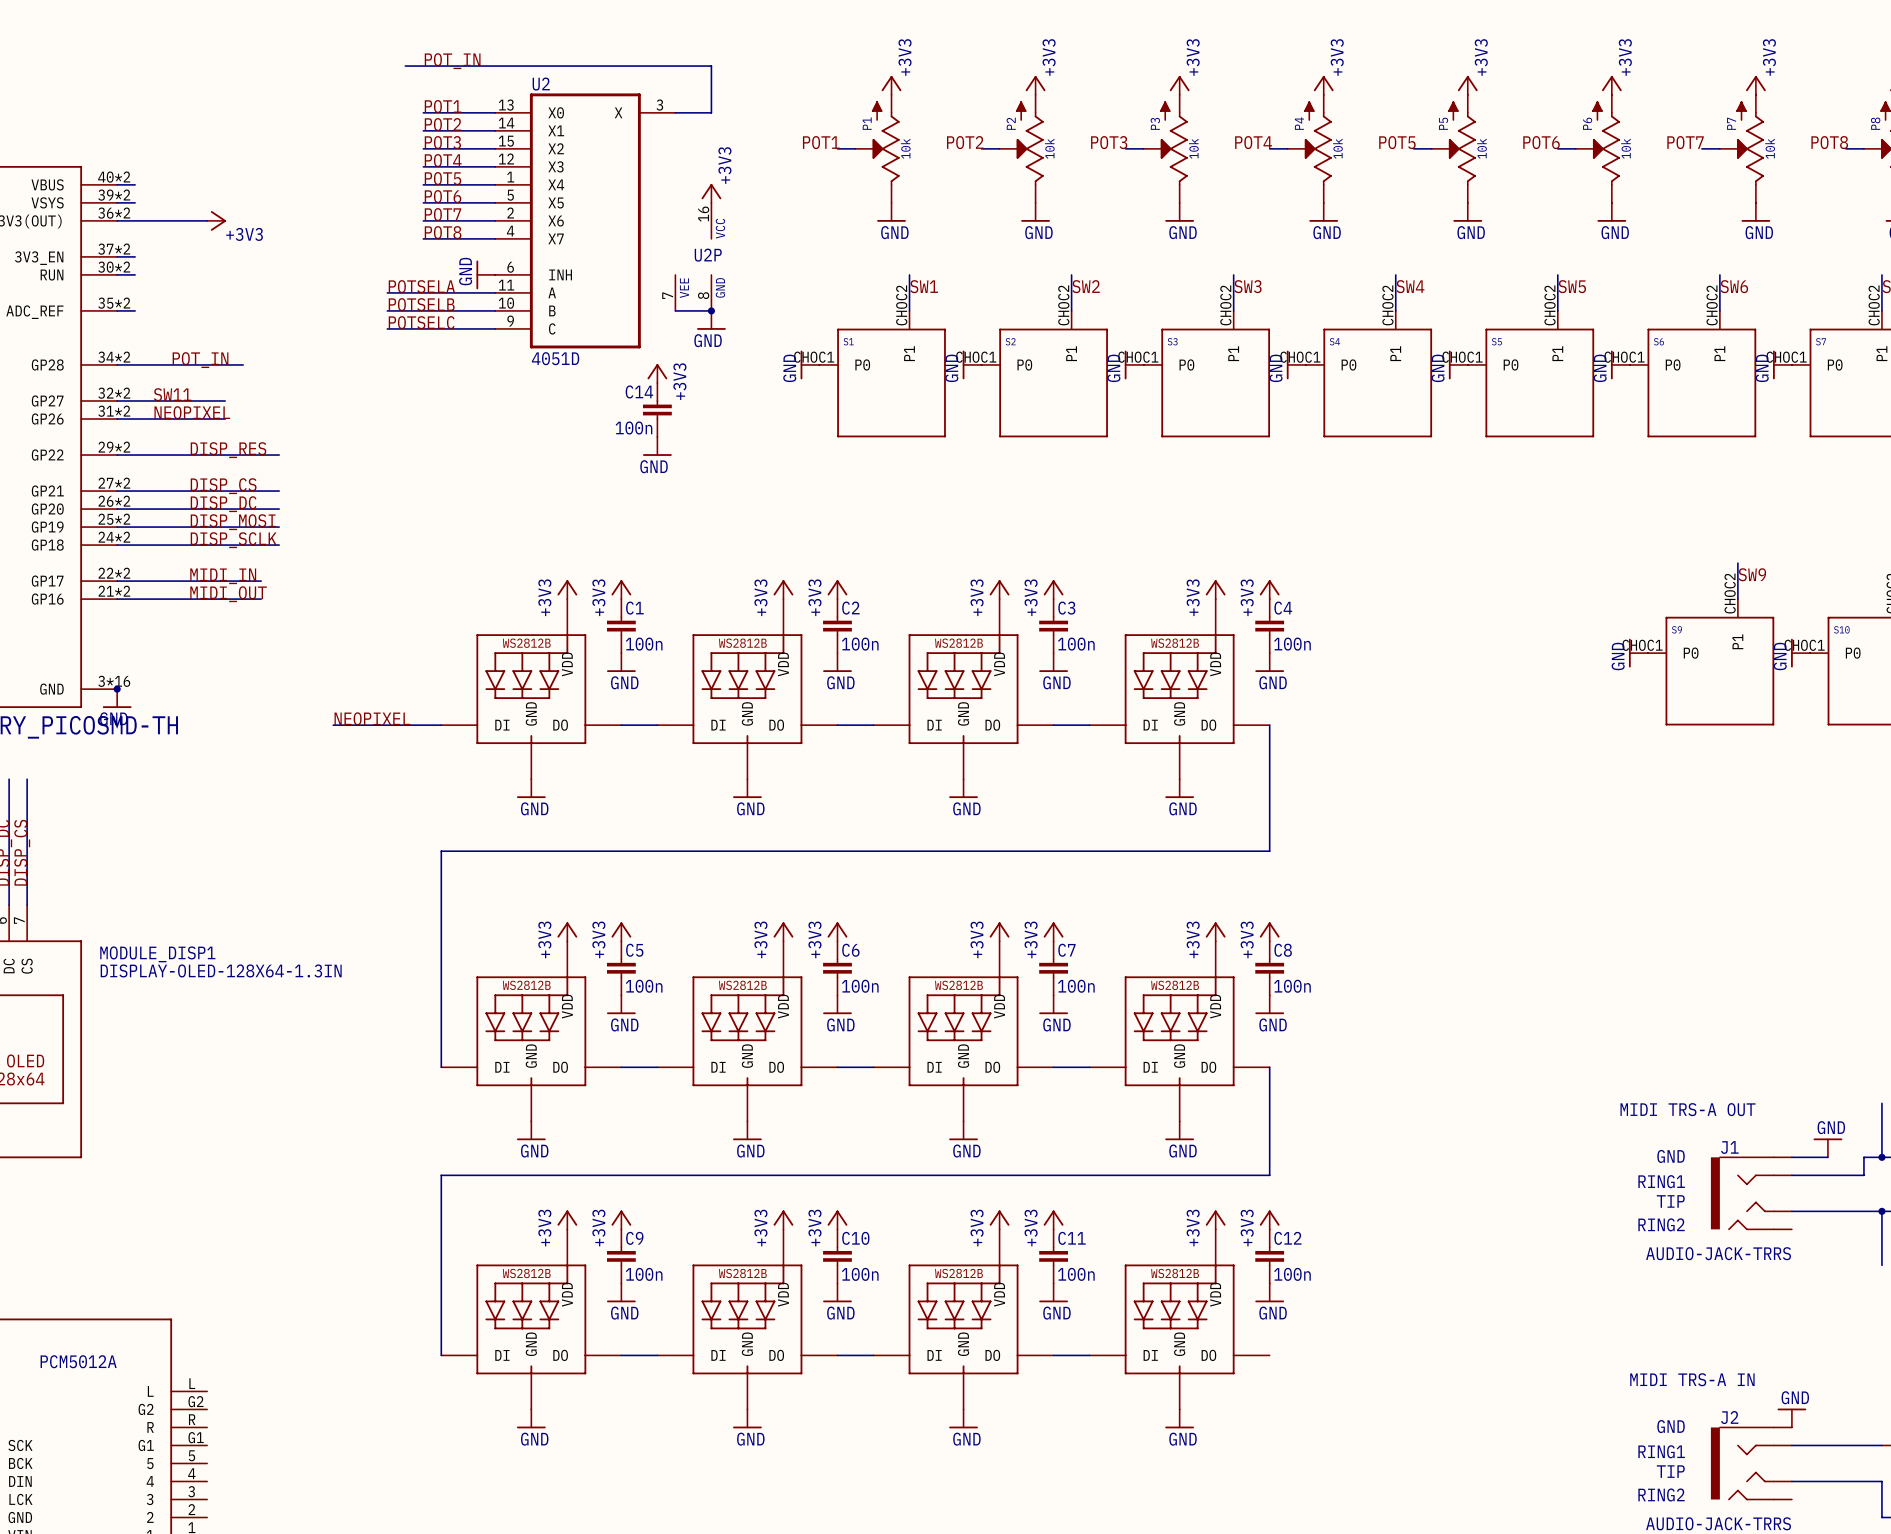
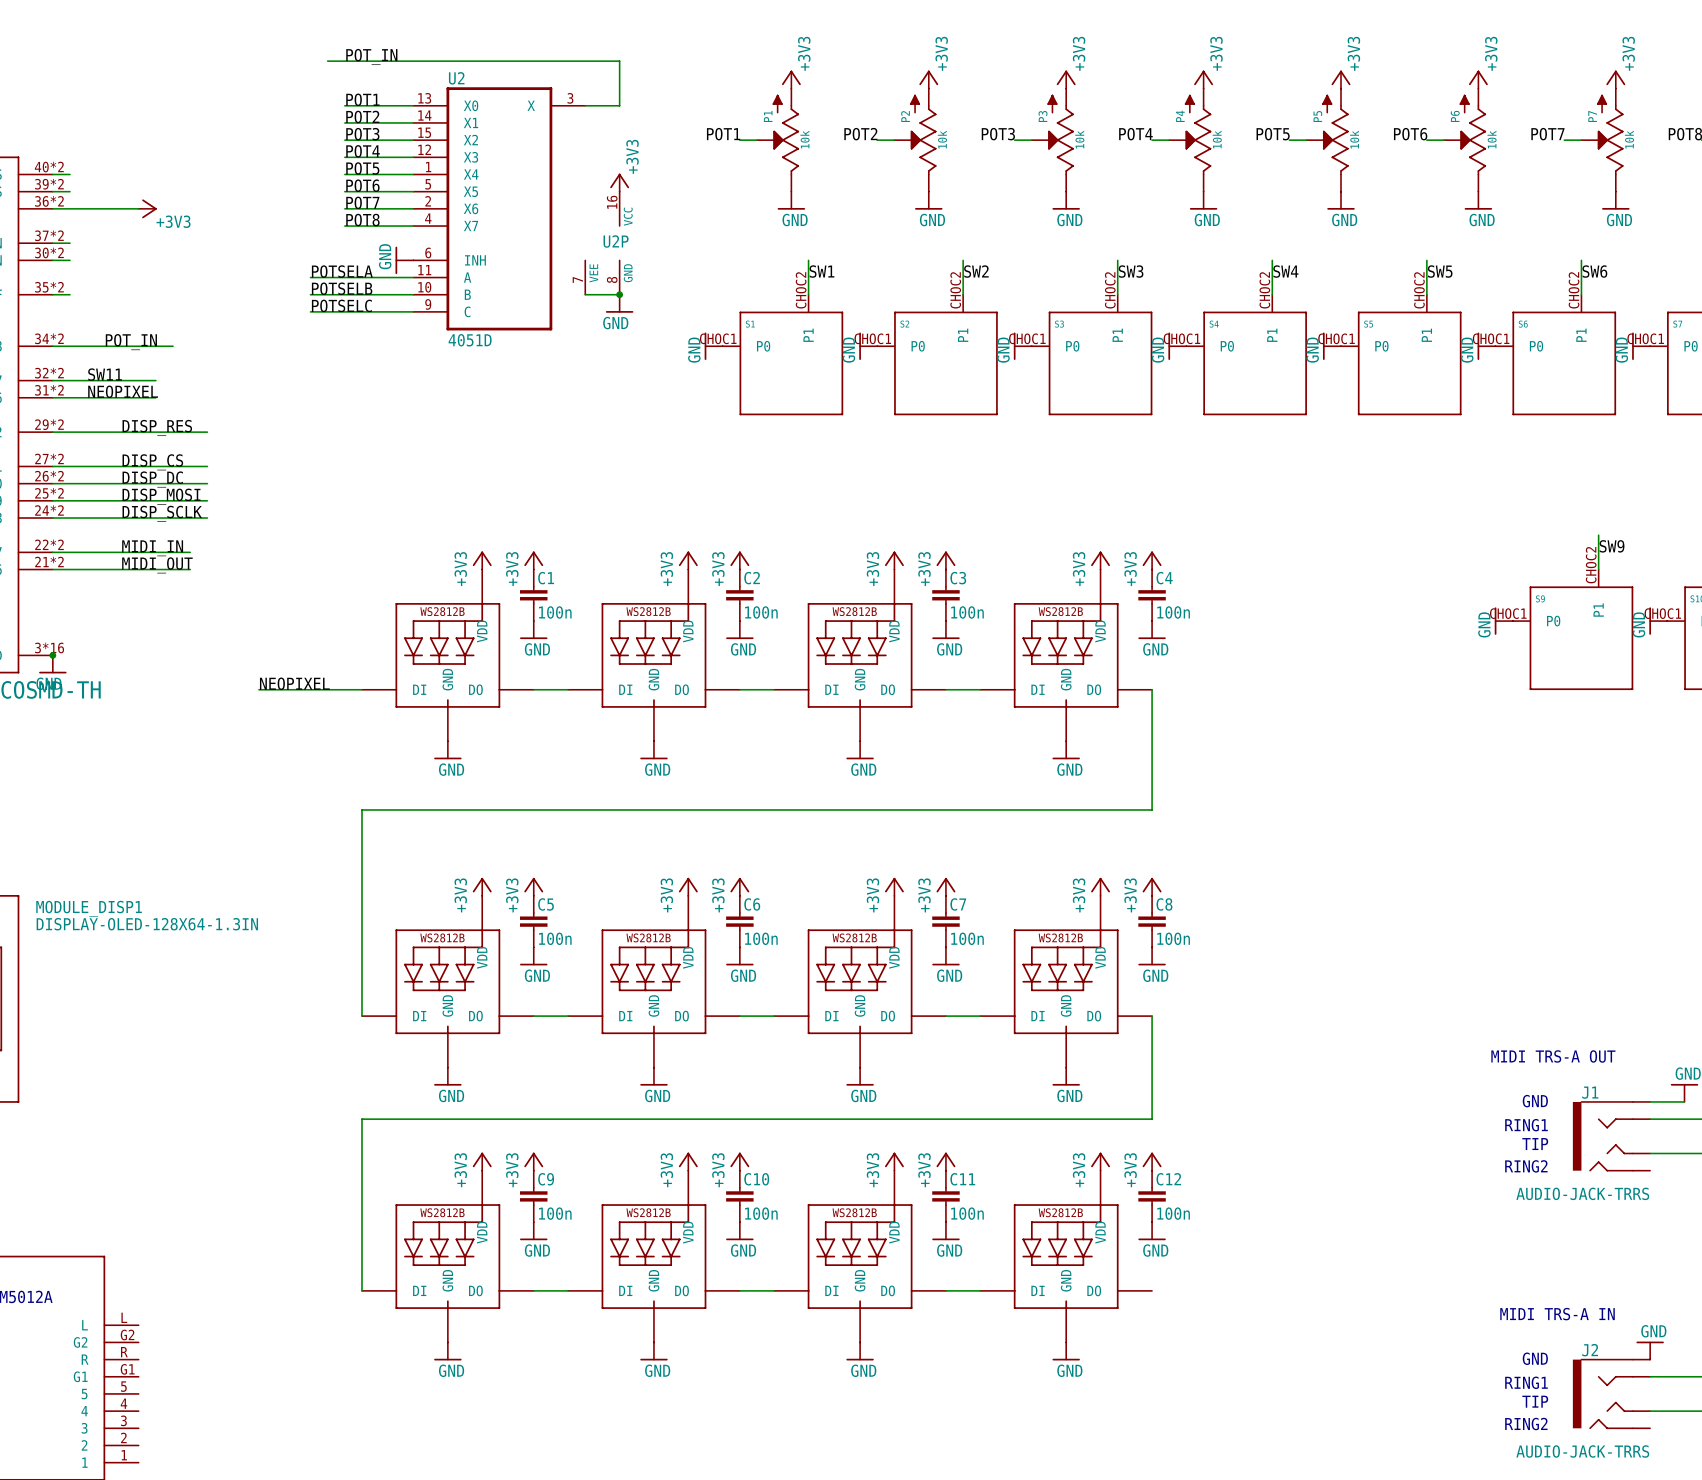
power symbol: +3V3 (657, 373) -> none
C14: 100n (657, 409) -> none
power symbol: GND (657, 446) -> none

